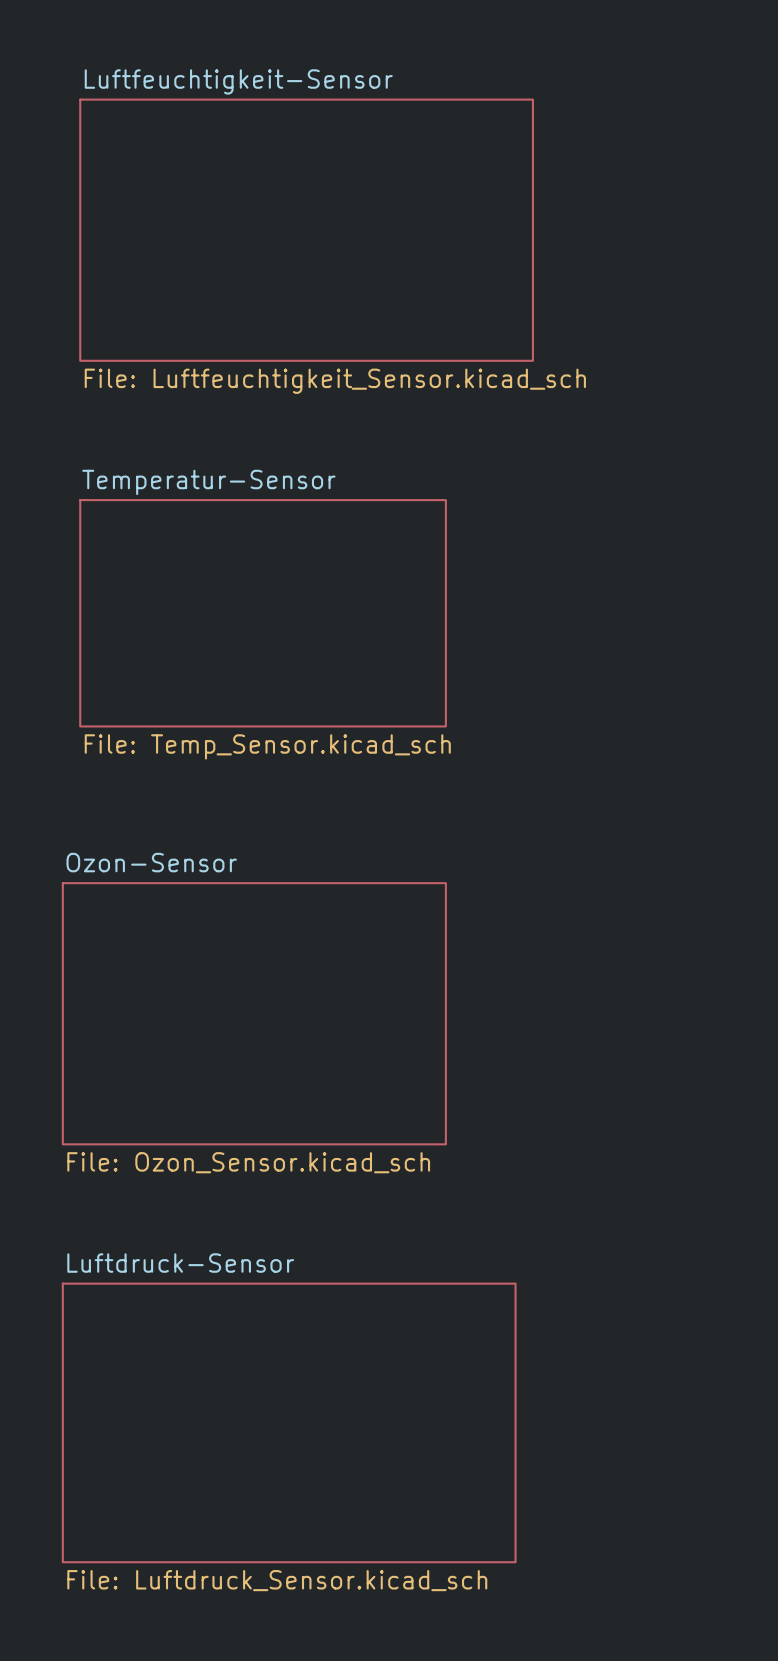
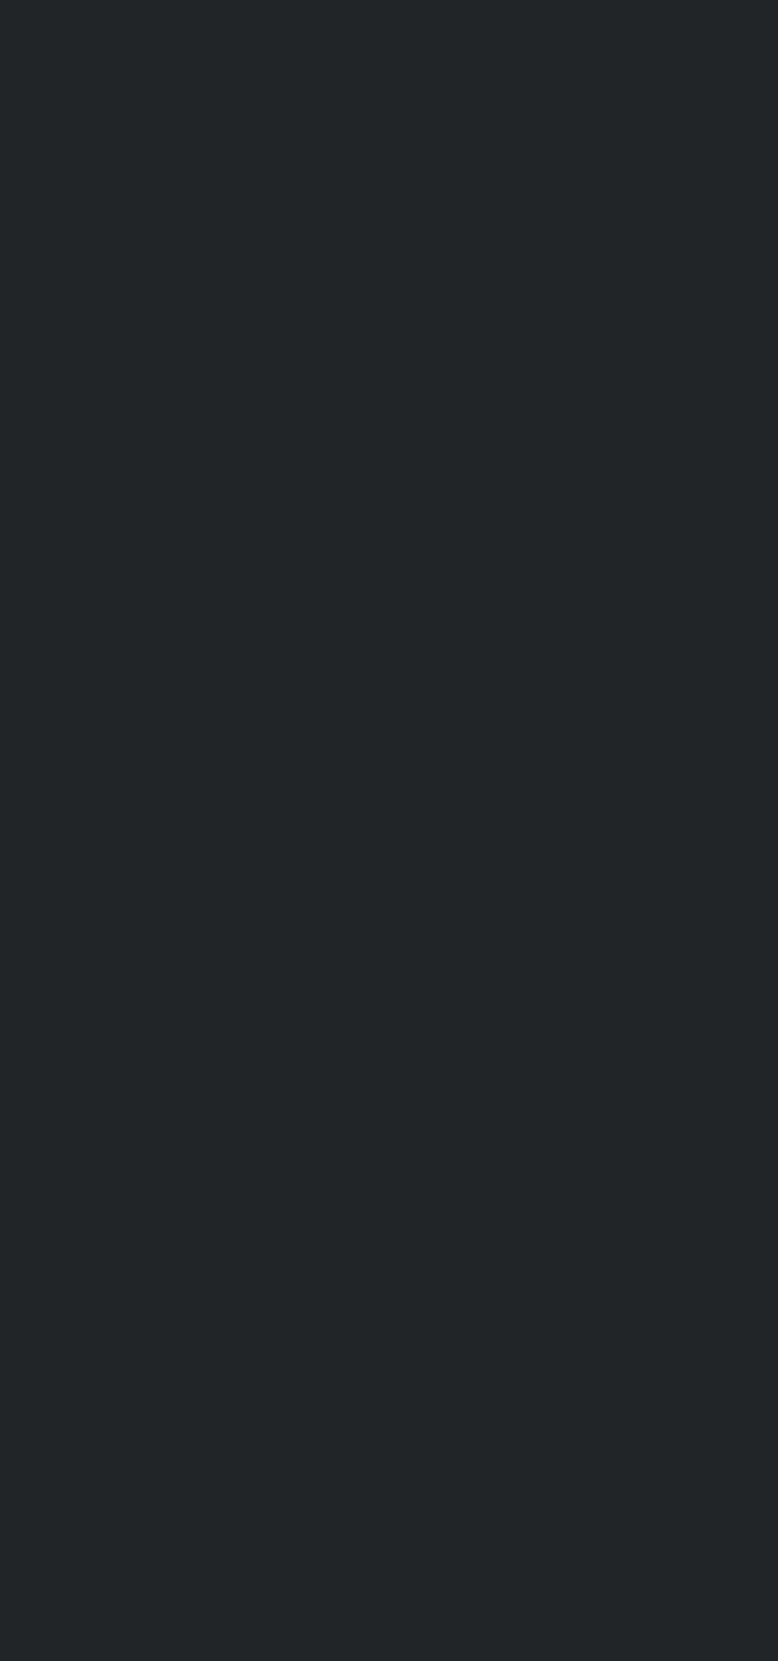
sheet Luftfeuchtigkeit-Sensor: File: Luftfeuchtigkeit_Sensor.kicad_sch (306, 230) -> none
sheet Temperatur-Sensor: File: Temp_Sensor.kicad_sch (263, 613) -> none
sheet Ozon-Sensor: File: Ozon_Sensor.kicad_sch (254, 1013) -> none
sheet Luftdruck-Sensor: File: Luftdruck_Sensor.kicad_sch (289, 1422) -> none

